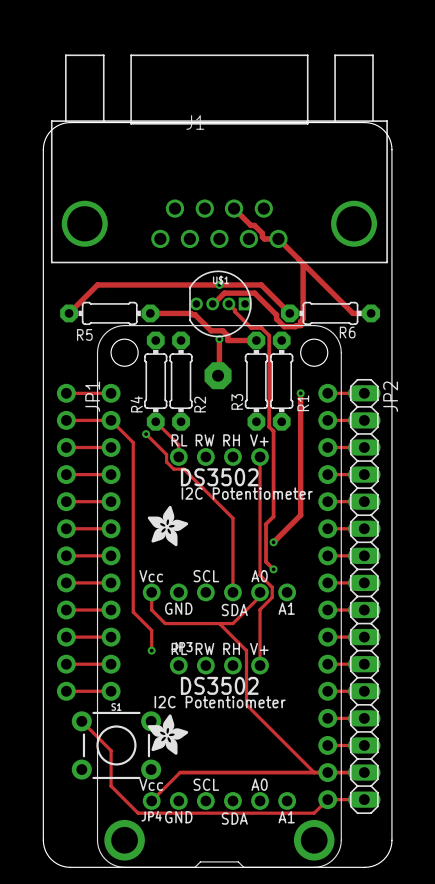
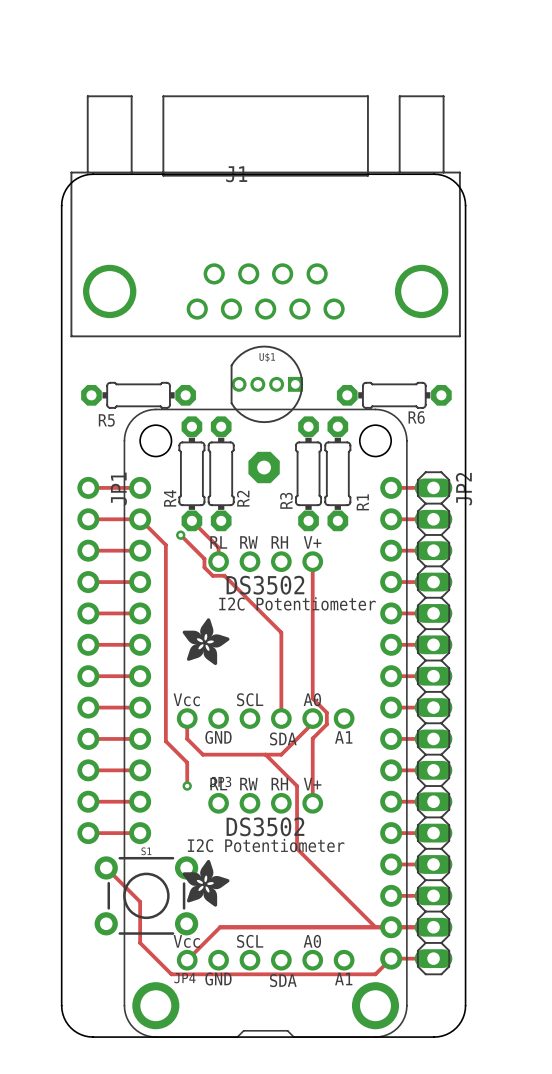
track: (234, 208) (250, 225) (254, 225) (262, 233) (264, 238) (278, 238) (352, 313) (371, 313) -> none
track: (303, 263) (303, 318) (300, 325) (284, 326) (276, 318) (276, 315) (254, 293) (224, 293) (212, 303) -> none
via: (219, 284) -> none
track: (228, 303) (251, 328) (261, 328) (269, 335) (269, 426) (273, 431) (273, 516) (266, 524) (266, 561) (273, 569) -> none
track: (69, 313) (97, 284) (261, 284) (289, 313) -> none
track: (150, 313) (190, 313) (194, 314) (211, 330) (222, 330) (227, 335) (227, 340) (256, 340) -> none
track: (219, 339) (218, 375) -> none
via: (219, 339) -> none
track: (300, 393) (300, 515) (273, 542) -> none
via: (300, 393) -> none
via: (273, 542) -> none
via: (273, 569) -> none

